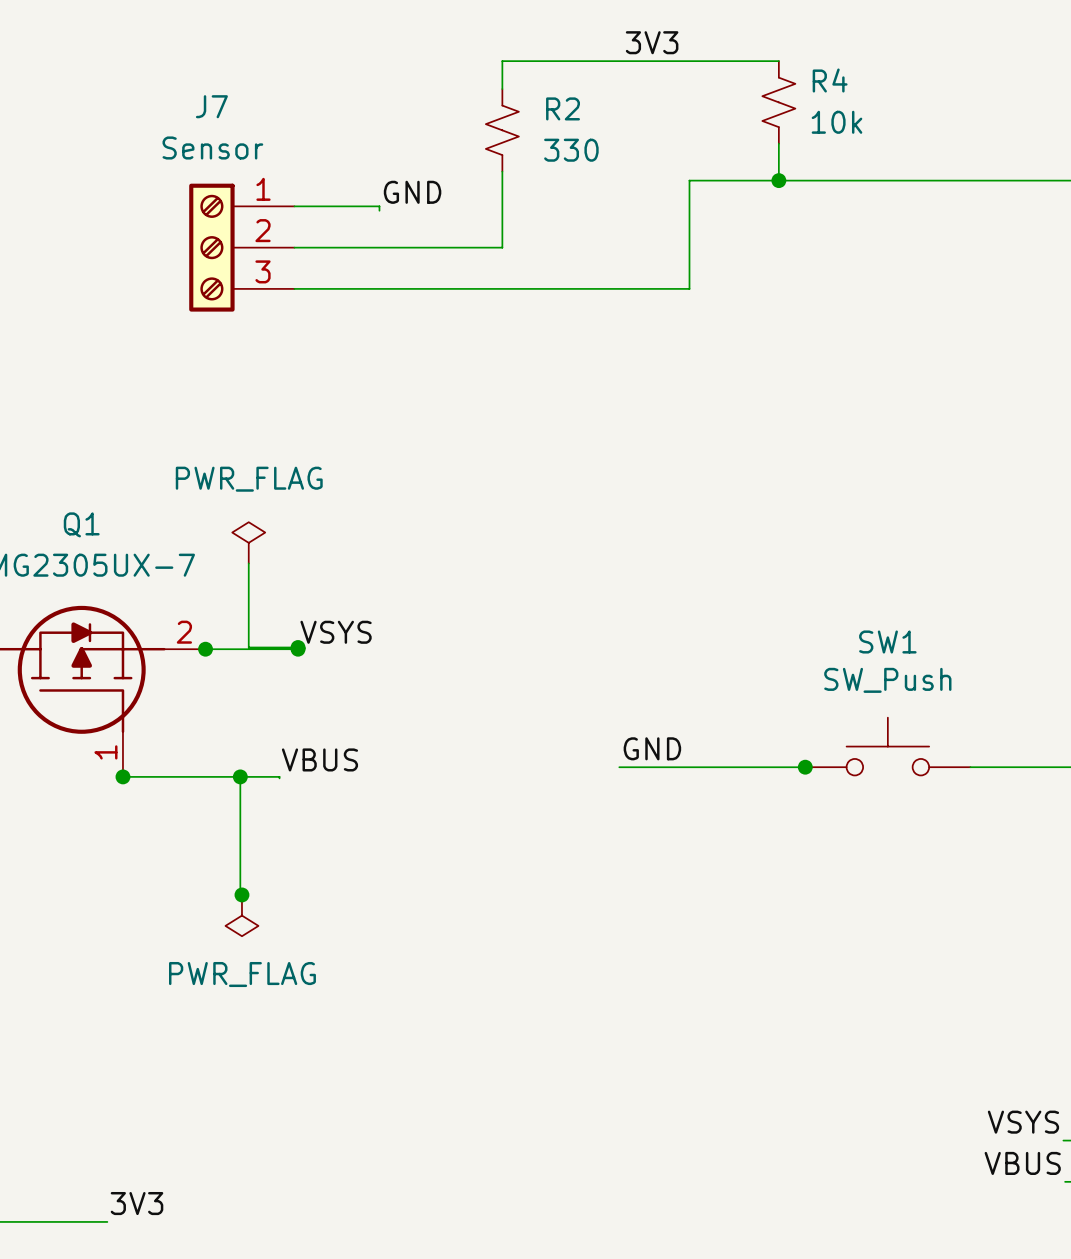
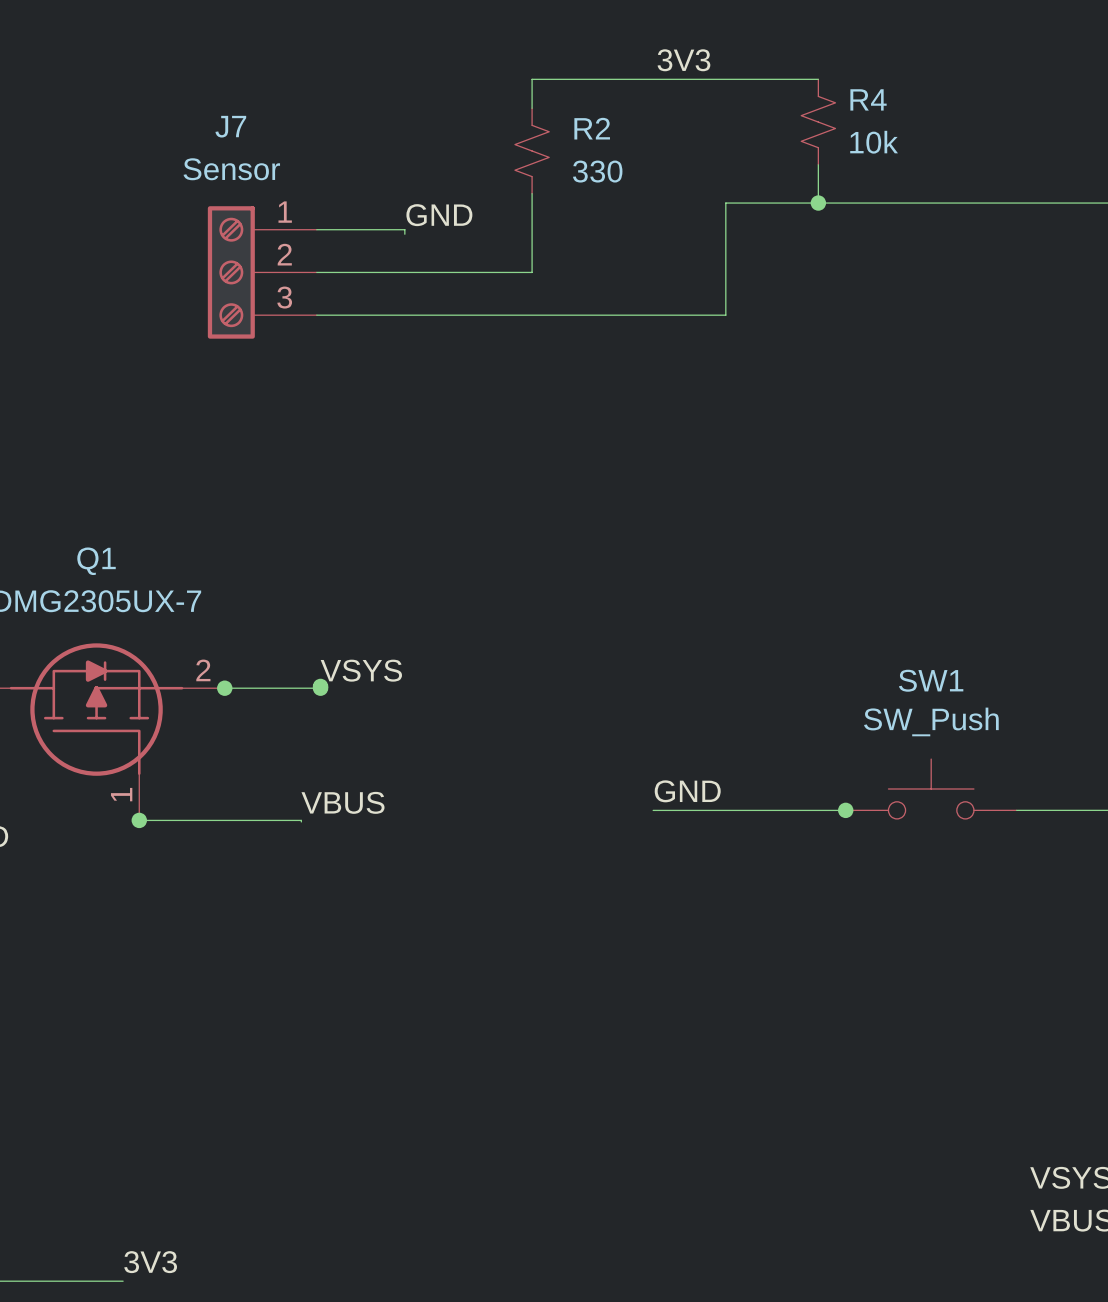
power symbol: PWR_FLAG (248, 542) -> none
wire: (248, 563) (248, 647) (298, 647) -> none
wire: (240, 776) (240, 894) (241, 894) -> none
junction: (240, 776) -> none
junction: (241, 894) -> none
power symbol: PWR_FLAG (241, 915) -> none

